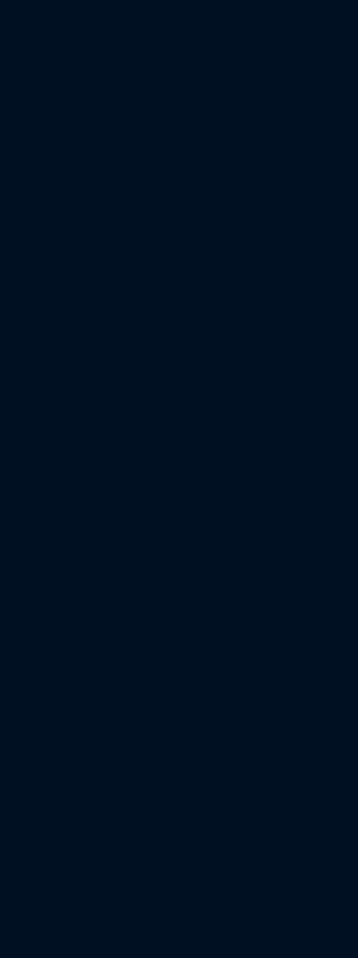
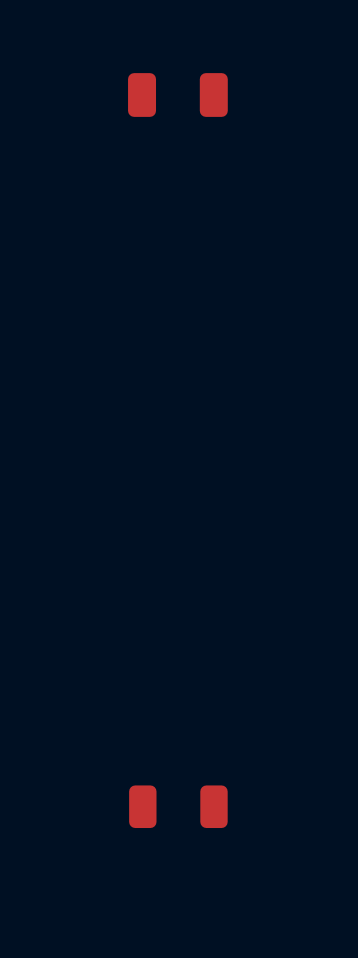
part: none -> (177, 95)
part: none -> (178, 806)

